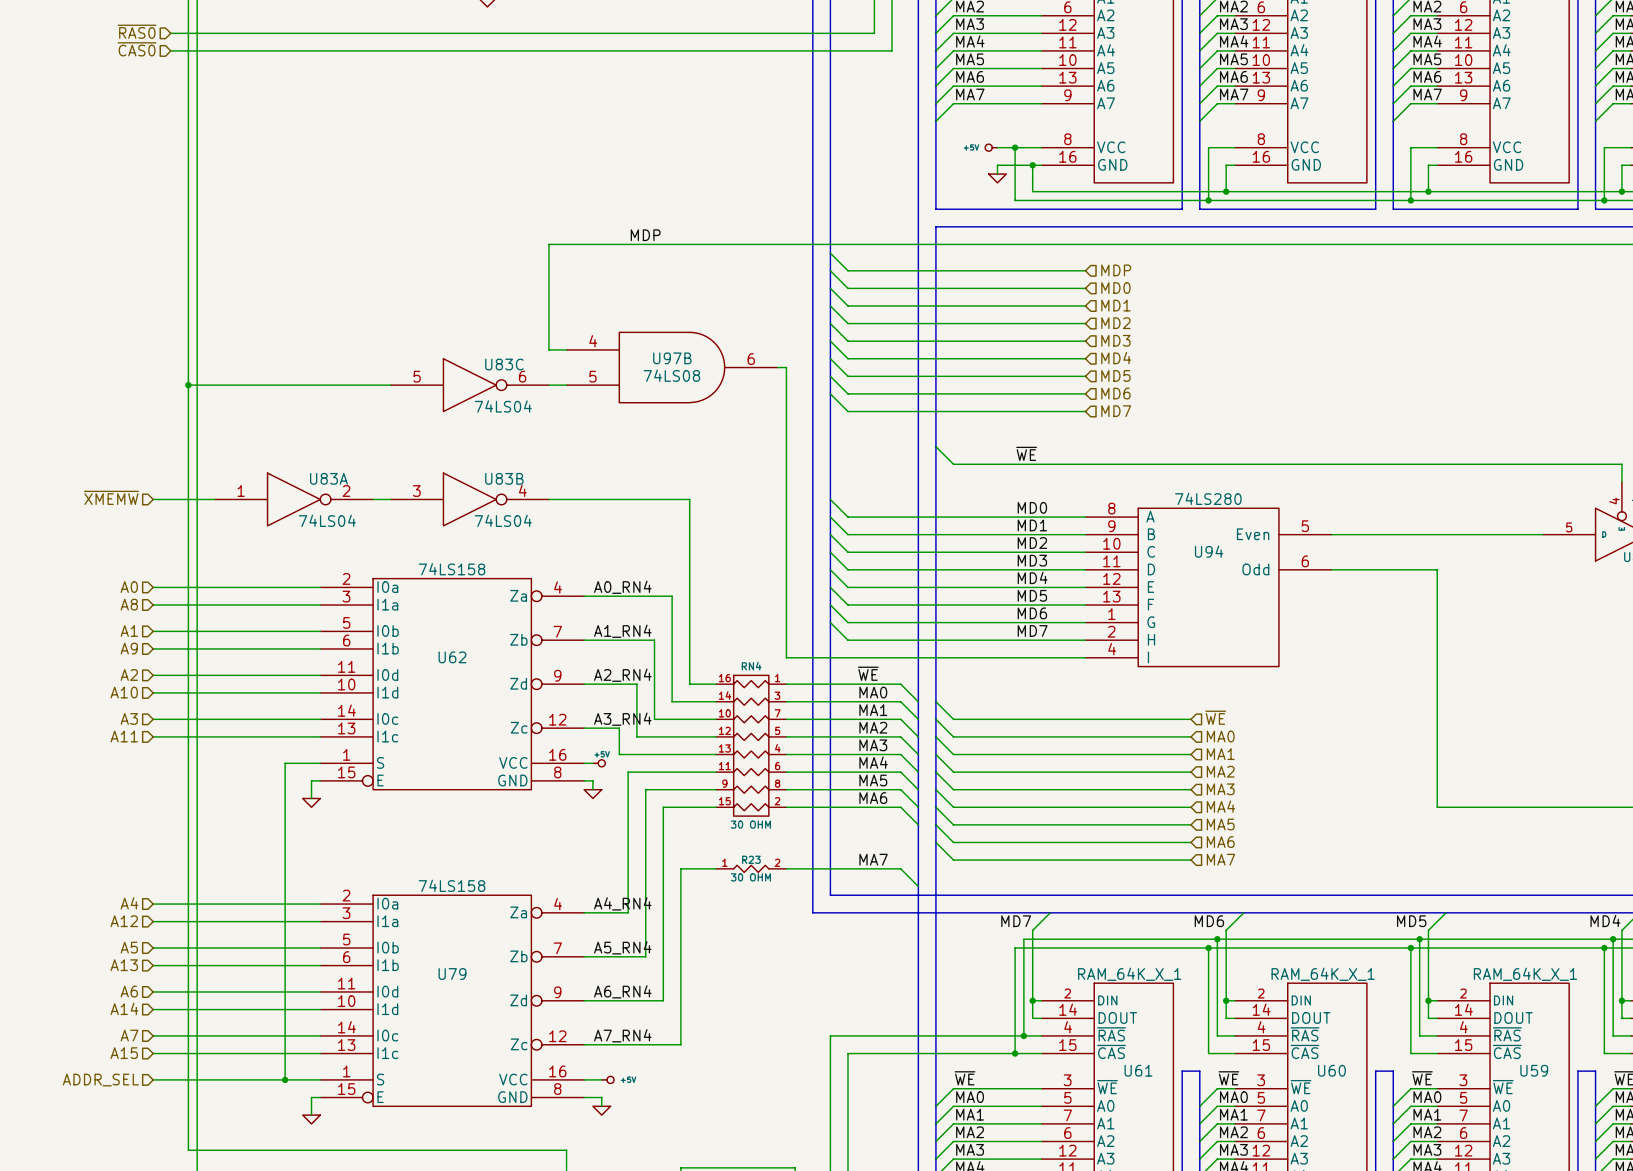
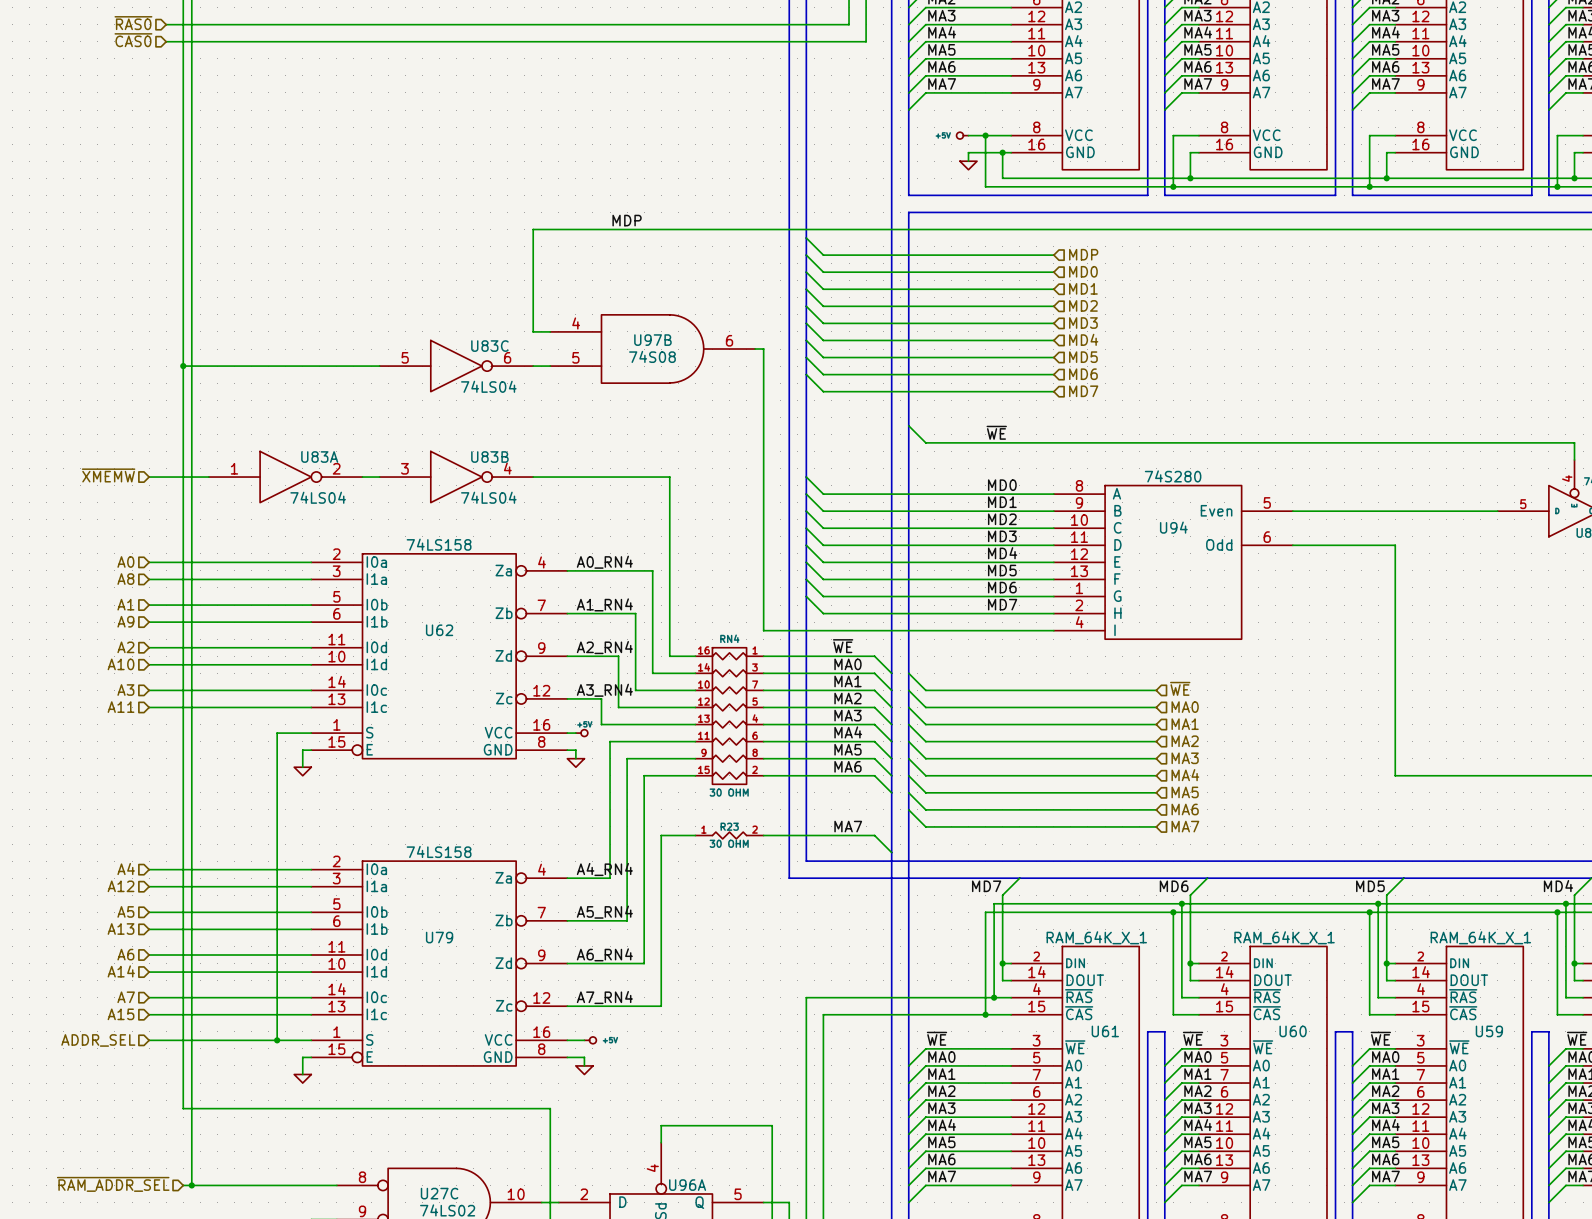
U97B value: 74LS08 (671, 375) -> 74S08 (652, 356)
U94 value: 74LS280 (1208, 498) -> 74S280 (1173, 476)

